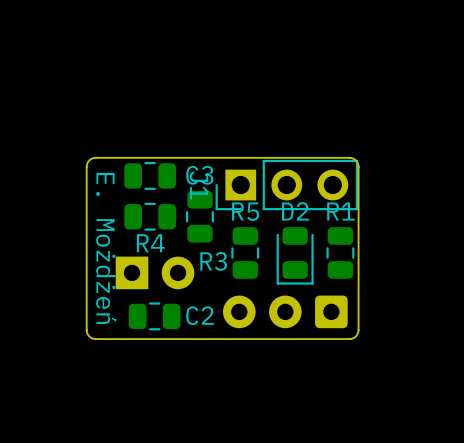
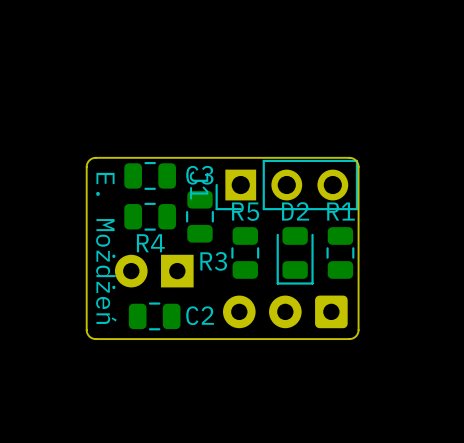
part rotation: 0° (155, 272) -> 180° (154, 271)

